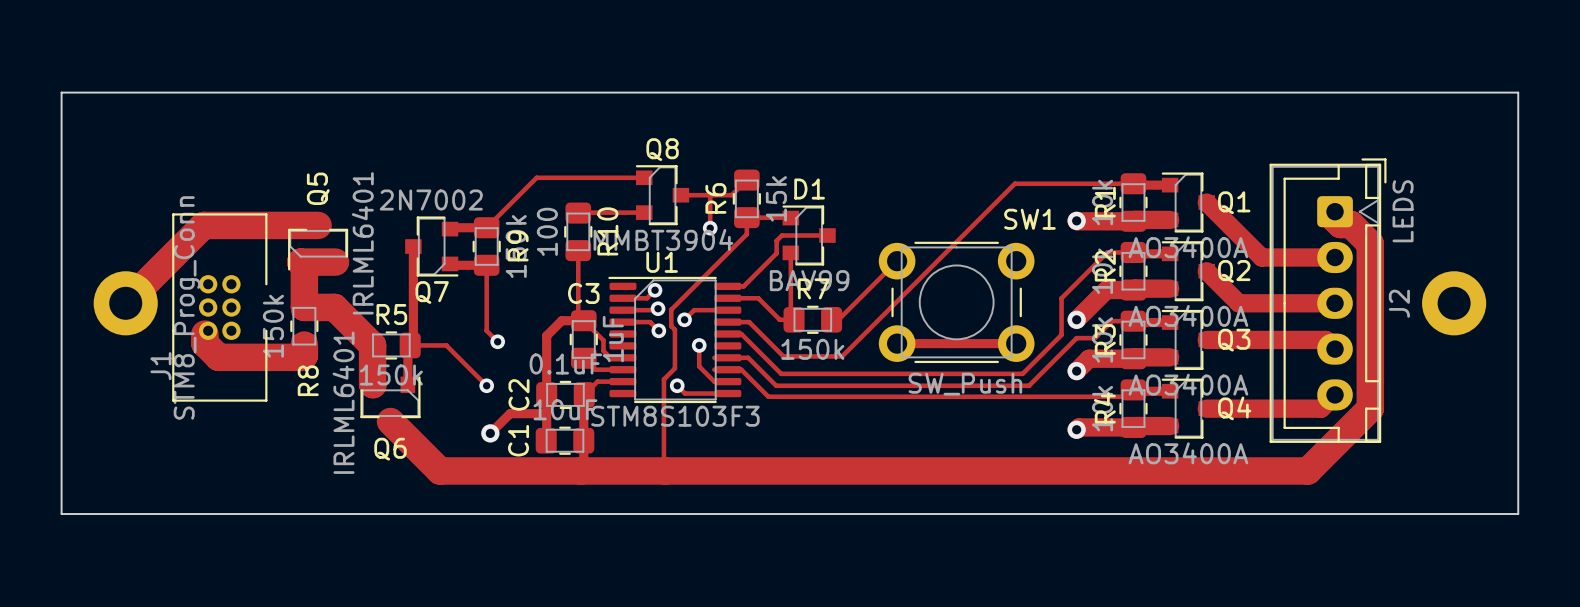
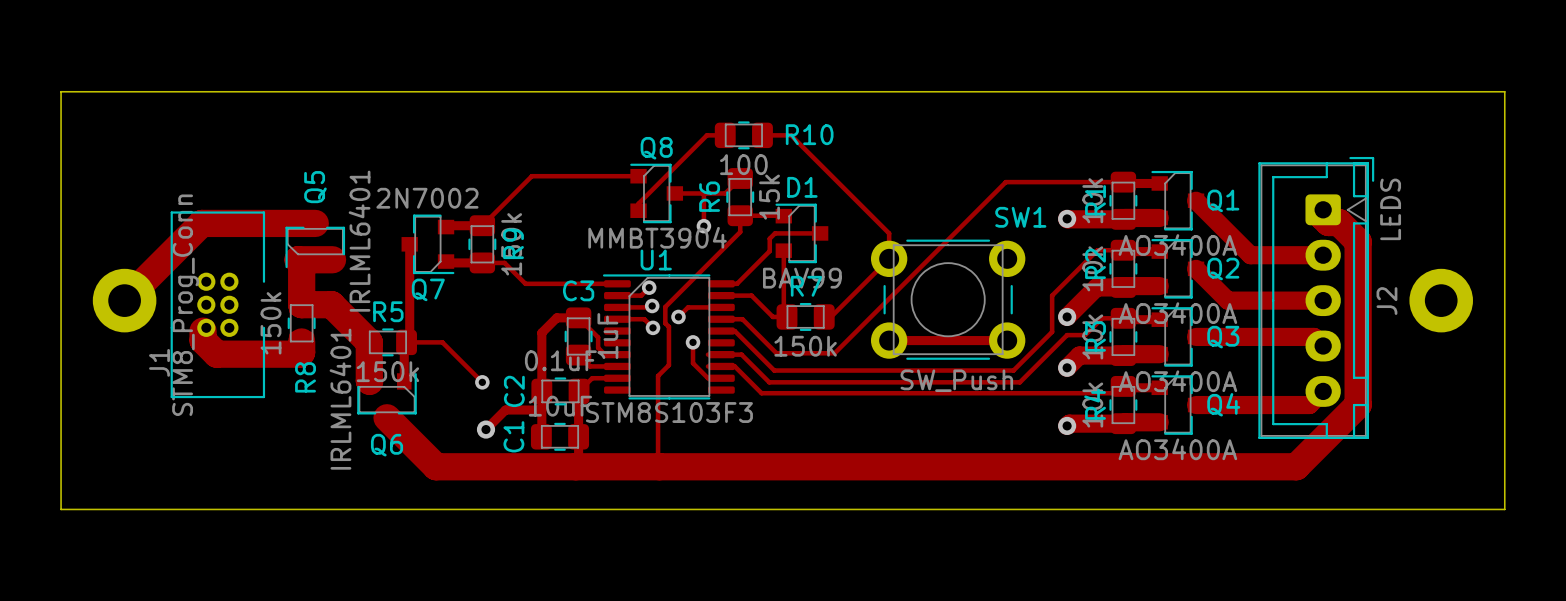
track: none -> (762, 135) (791, 135) (889, 233) (889, 258)
track: (644, 212) (578, 213) -> (638, 210) (638, 203) (706, 135) (725, 135)
R10 value position: 100 (547, 231) -> 100 (743, 164)
R10 rotation: 0° (578, 231) -> 90° clockwise (743, 135)
R10 position: (578, 231) -> (743, 135)
track: (578, 250) (578, 315) -> none
track: (486, 265) (486, 330) (497, 341) -> (482, 262) (504, 262) (525, 283) (617, 283)
via: (497, 341) -> none
track: (677, 385) (685, 393) (727, 393) -> none
via: (677, 385) -> none

